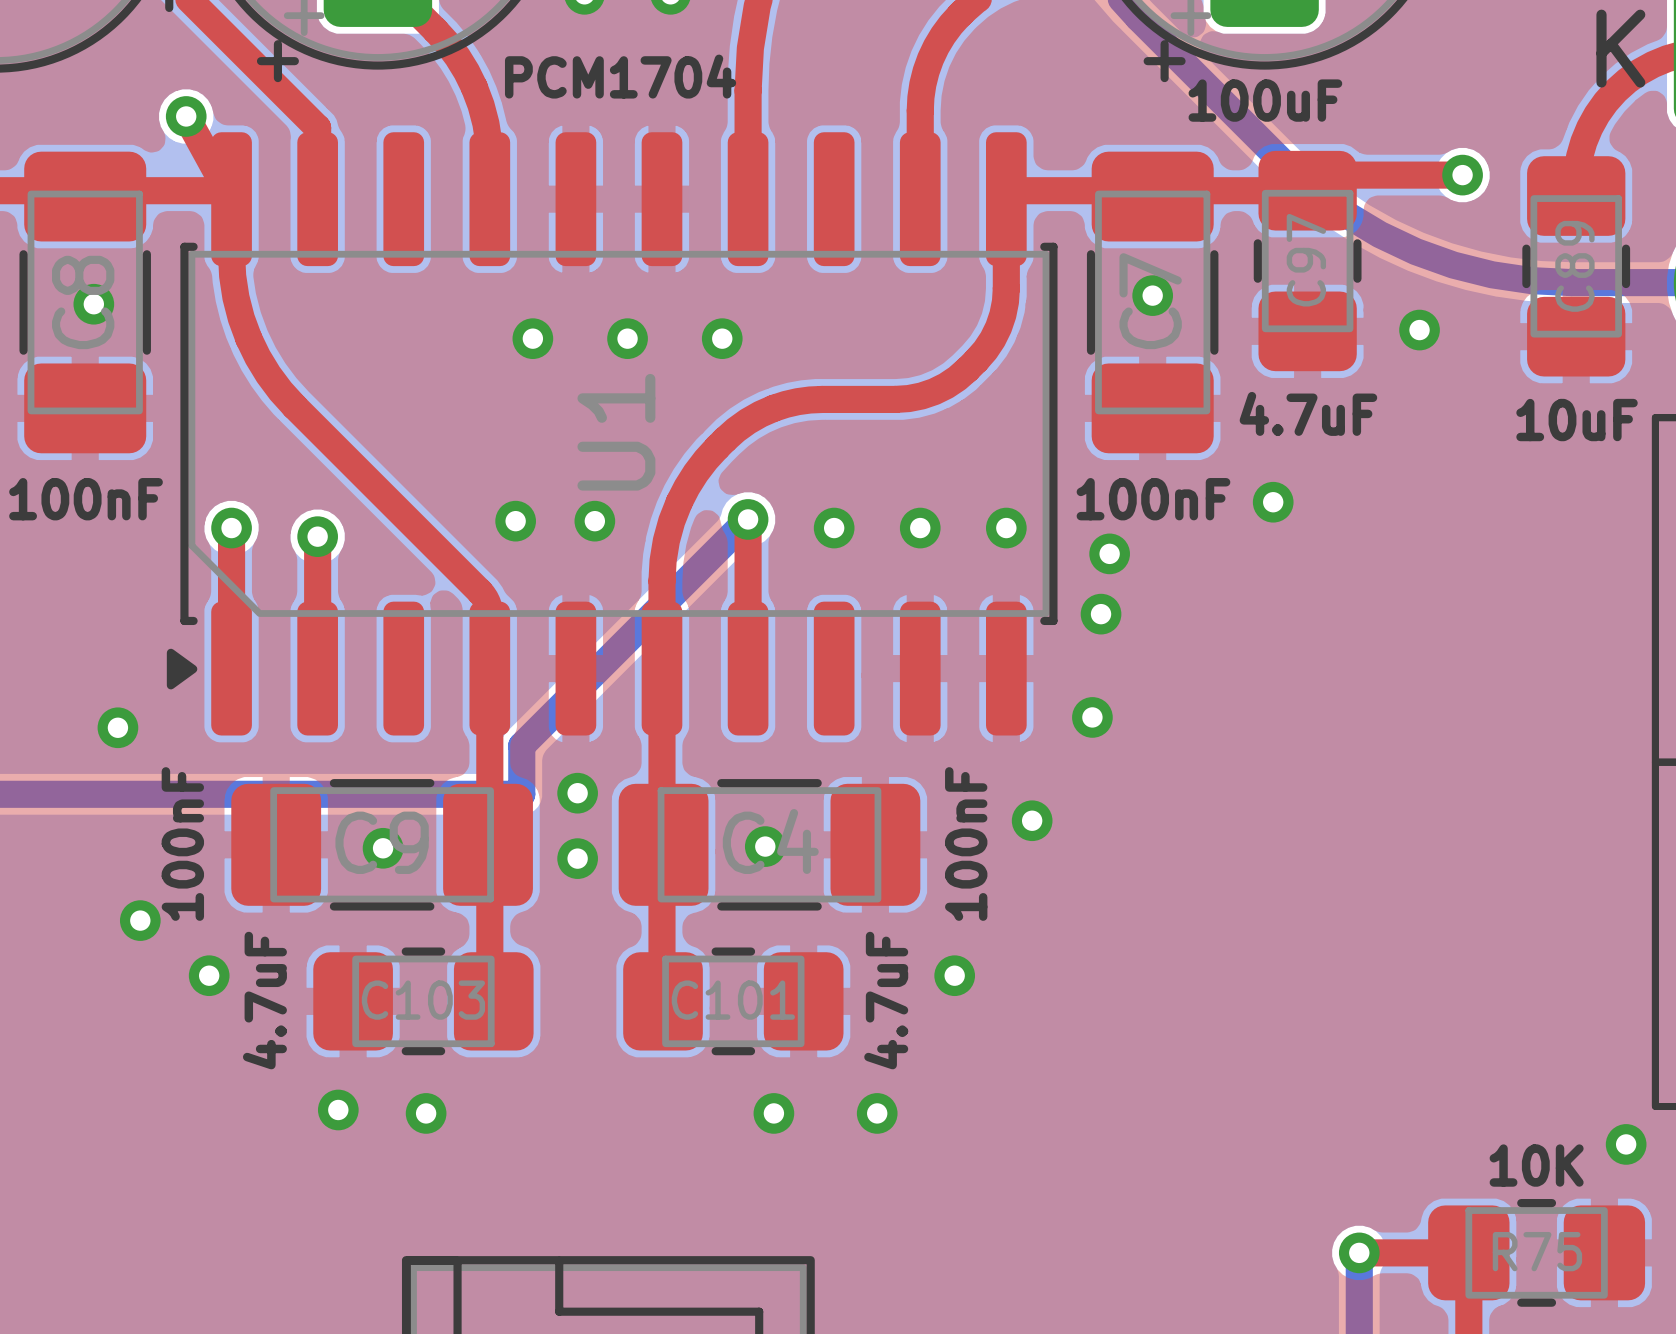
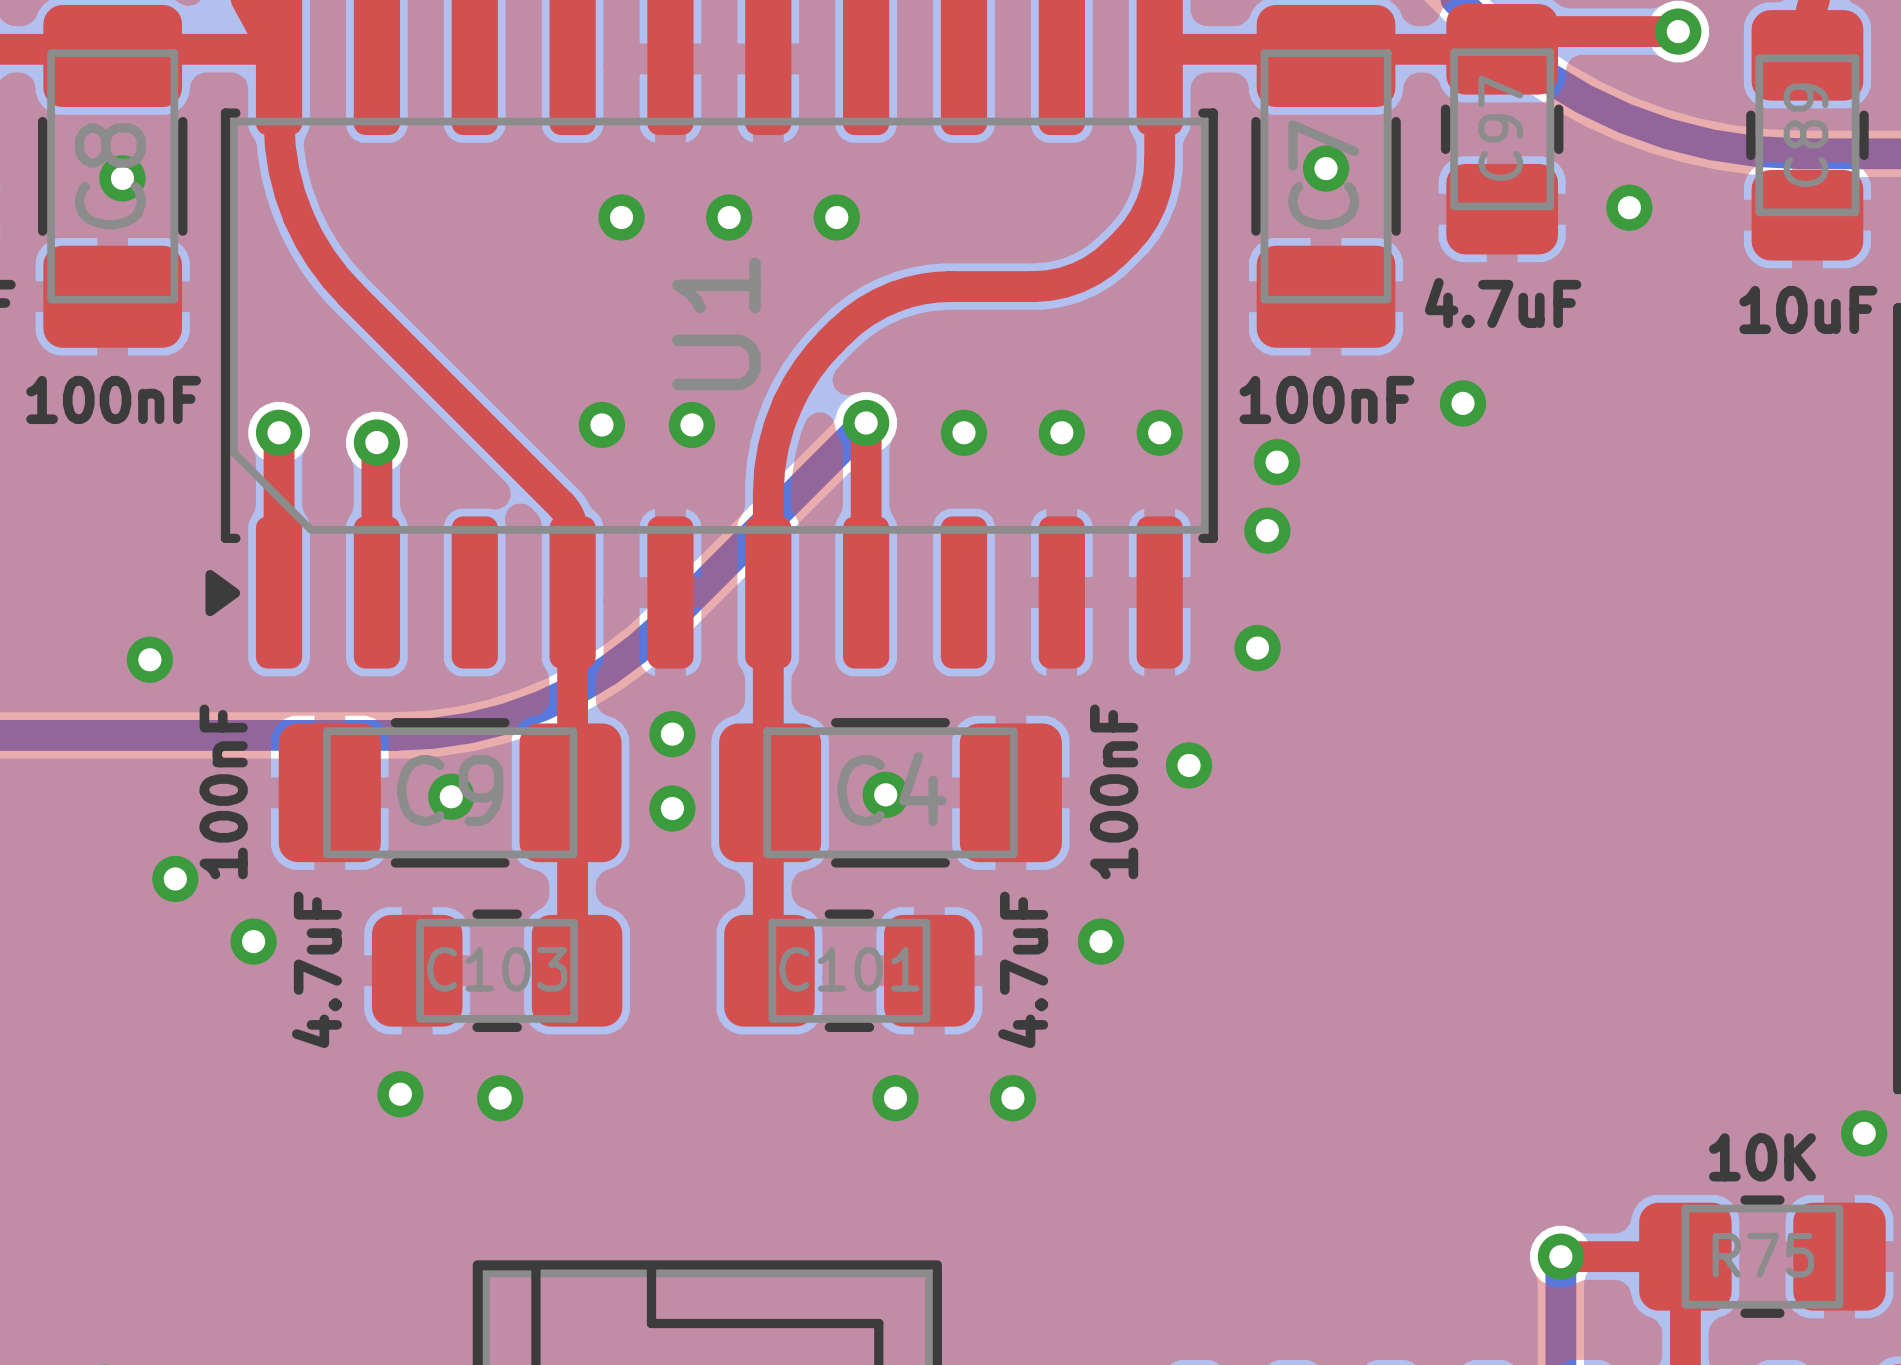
bottom track: (572, 695) (521, 745) (521, 794) (332, 794) -> (666, 622) (638, 647) (608, 670) (575, 689) (541, 706) (505, 718) (469, 728) (431, 733) (394, 735)

